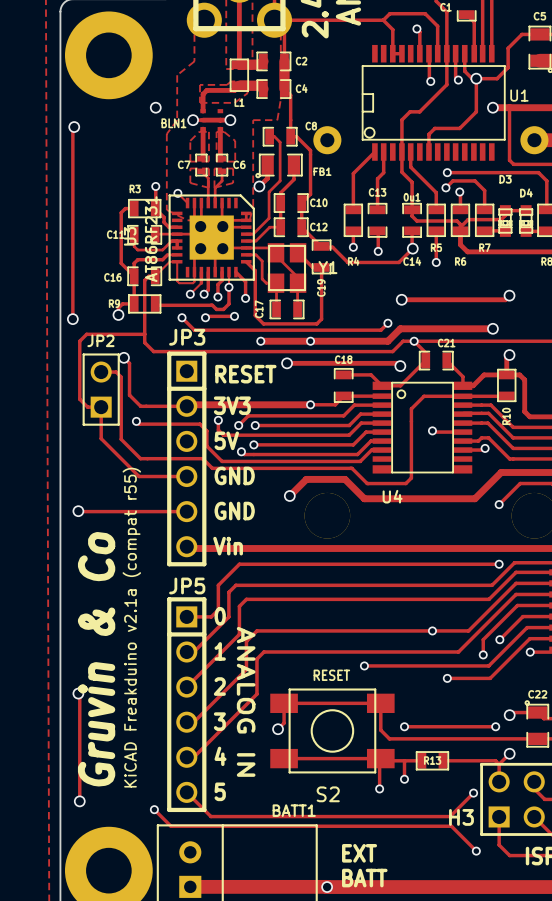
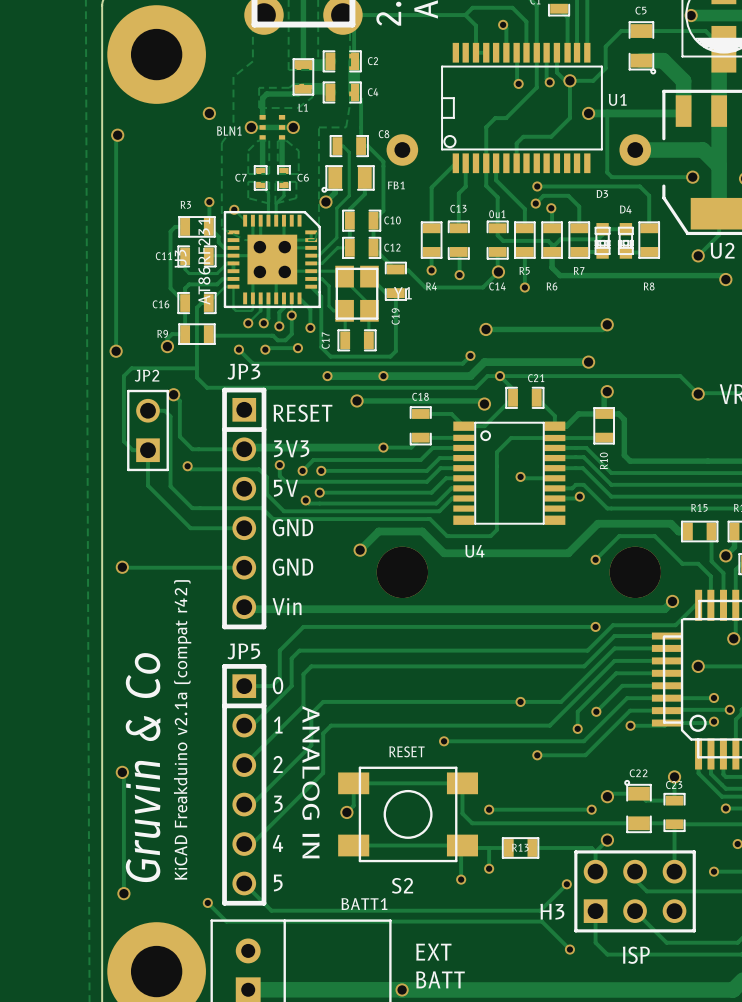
text: KiCAD Freakduino v2.1a (compat r55) (131, 627) -> KiCAD Freakduino v2.1a (compat r42) (182, 729)

